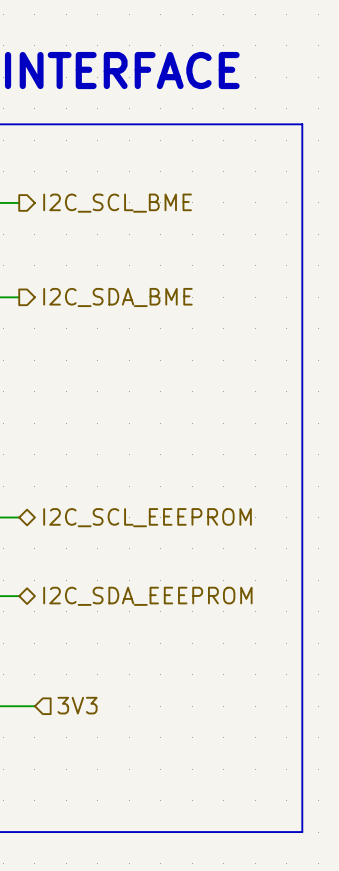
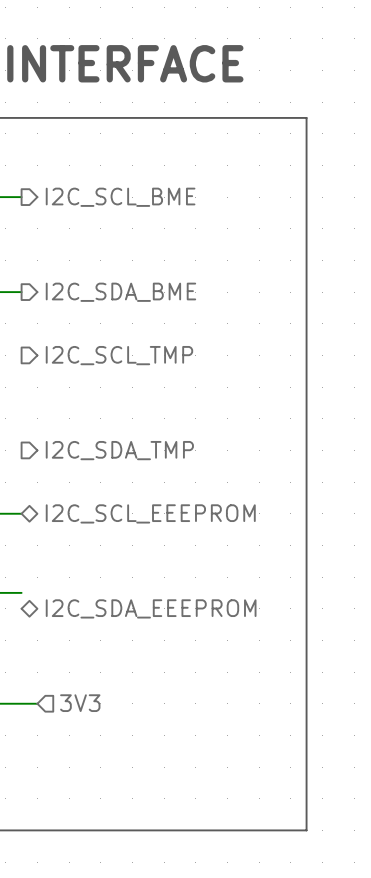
hierarchical label: none -> I2C_SCL_TMP (119, 355)
hierarchical label: none -> I2C_SDA_TMP (119, 450)
hierarchical label position: I2C_SDA_EEEPROM (147, 596) -> I2C_SDA_EEEPROM (151, 608)

